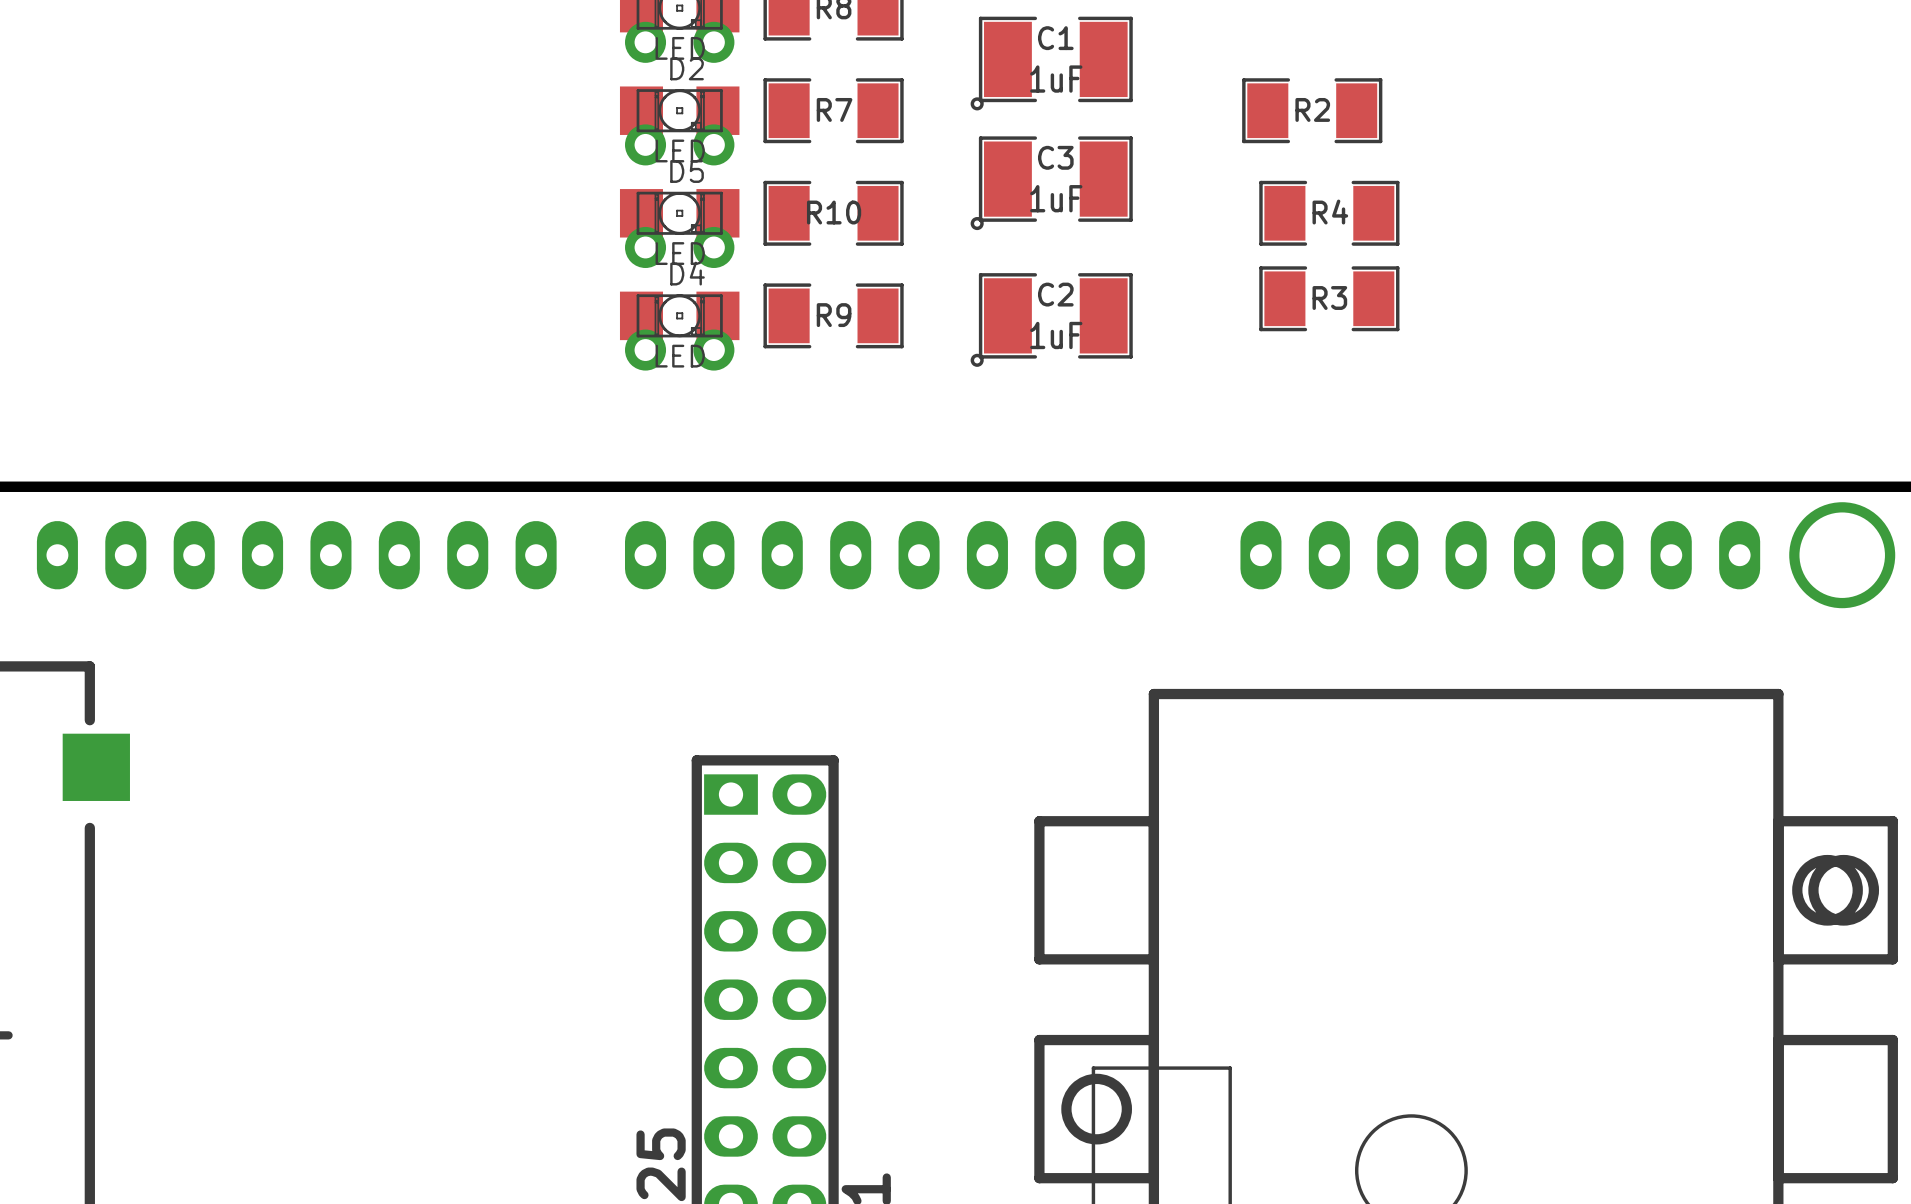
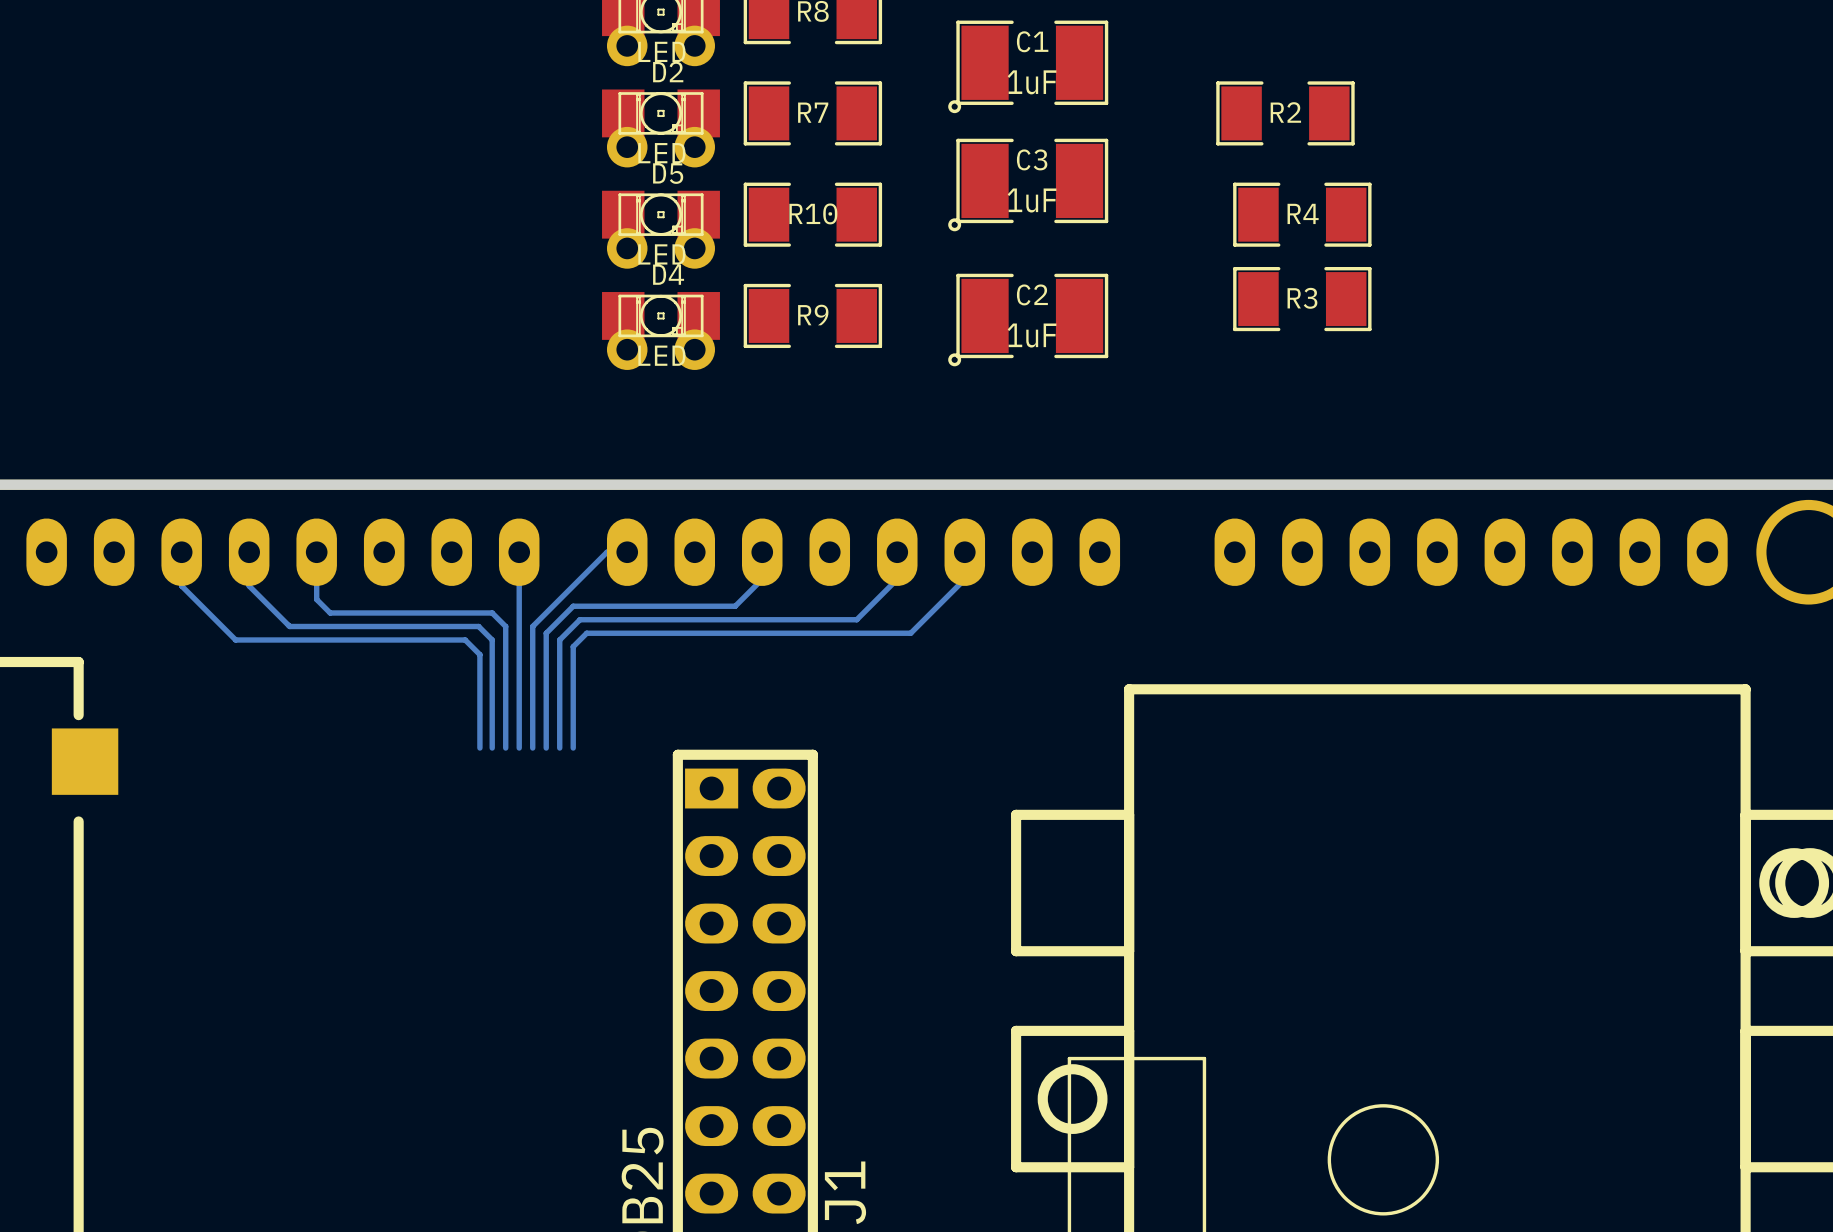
bottom track: none -> (181, 552) (181, 585) (235, 639) (465, 639) (479, 654) (479, 748)
bottom track: none -> (249, 552) (249, 585) (289, 626) (478, 626) (492, 639) (492, 748)
bottom track: none -> (316, 552) (316, 599) (330, 612) (492, 612) (505, 626) (505, 748)
bottom track: none -> (519, 552) (519, 748)
bottom track: none -> (627, 552) (606, 552) (532, 626) (532, 748)
bottom track: none -> (762, 552) (762, 579) (735, 606) (573, 606) (546, 633) (546, 748)
bottom track: none -> (897, 552) (897, 579) (856, 619) (579, 619) (559, 639) (559, 748)
bottom track: none -> (964, 552) (964, 579) (910, 633) (586, 633) (573, 646) (573, 748)

